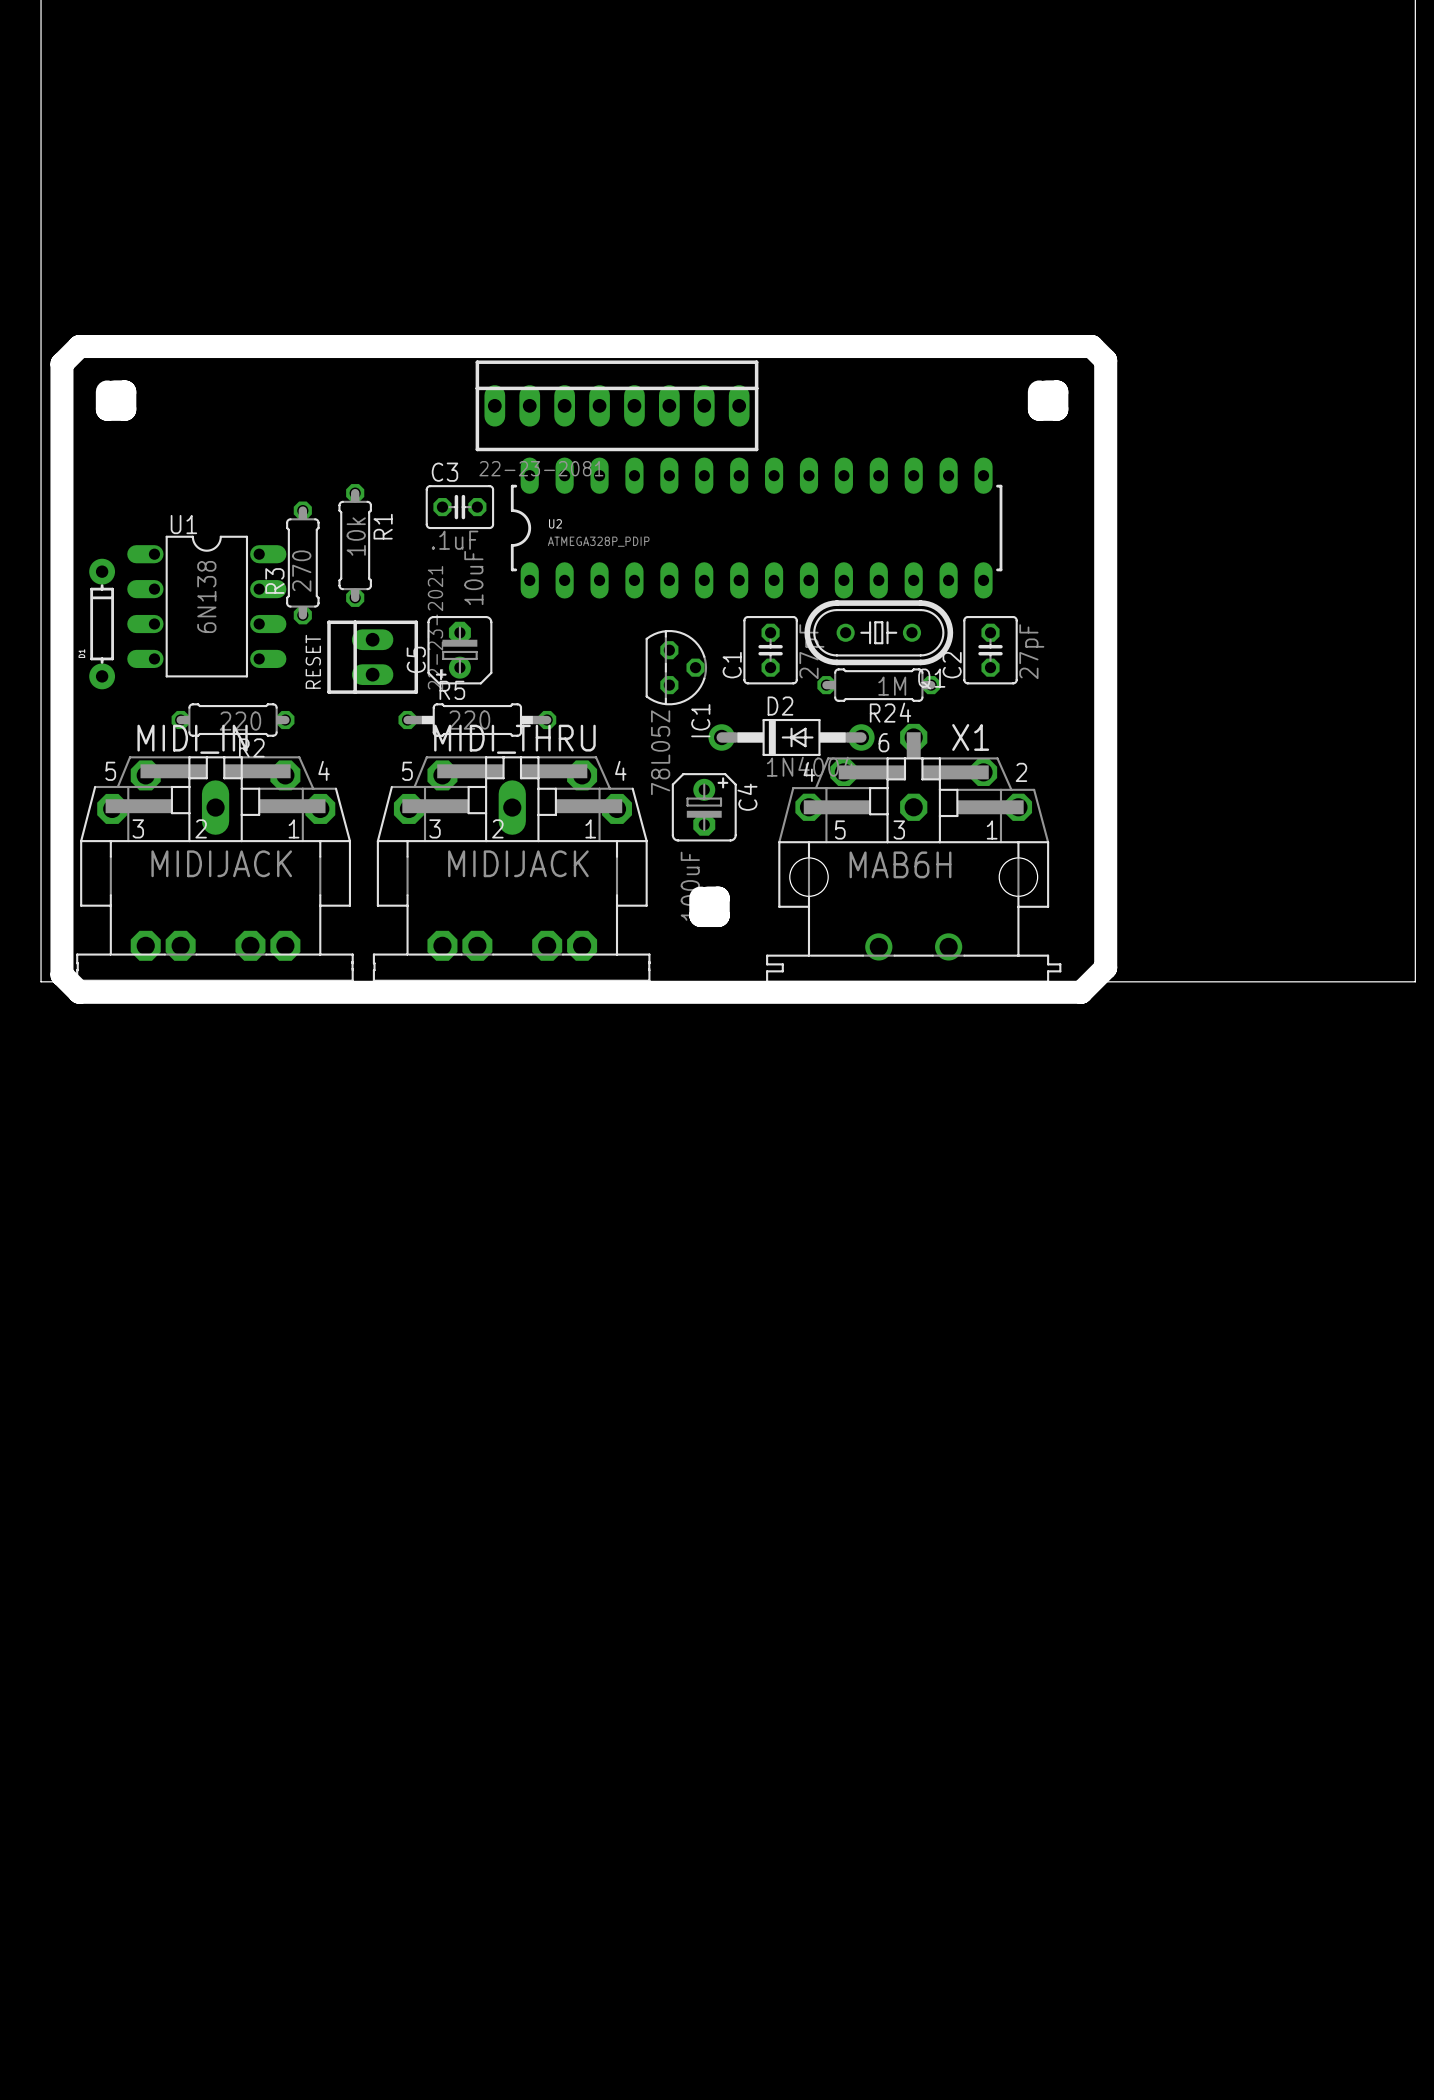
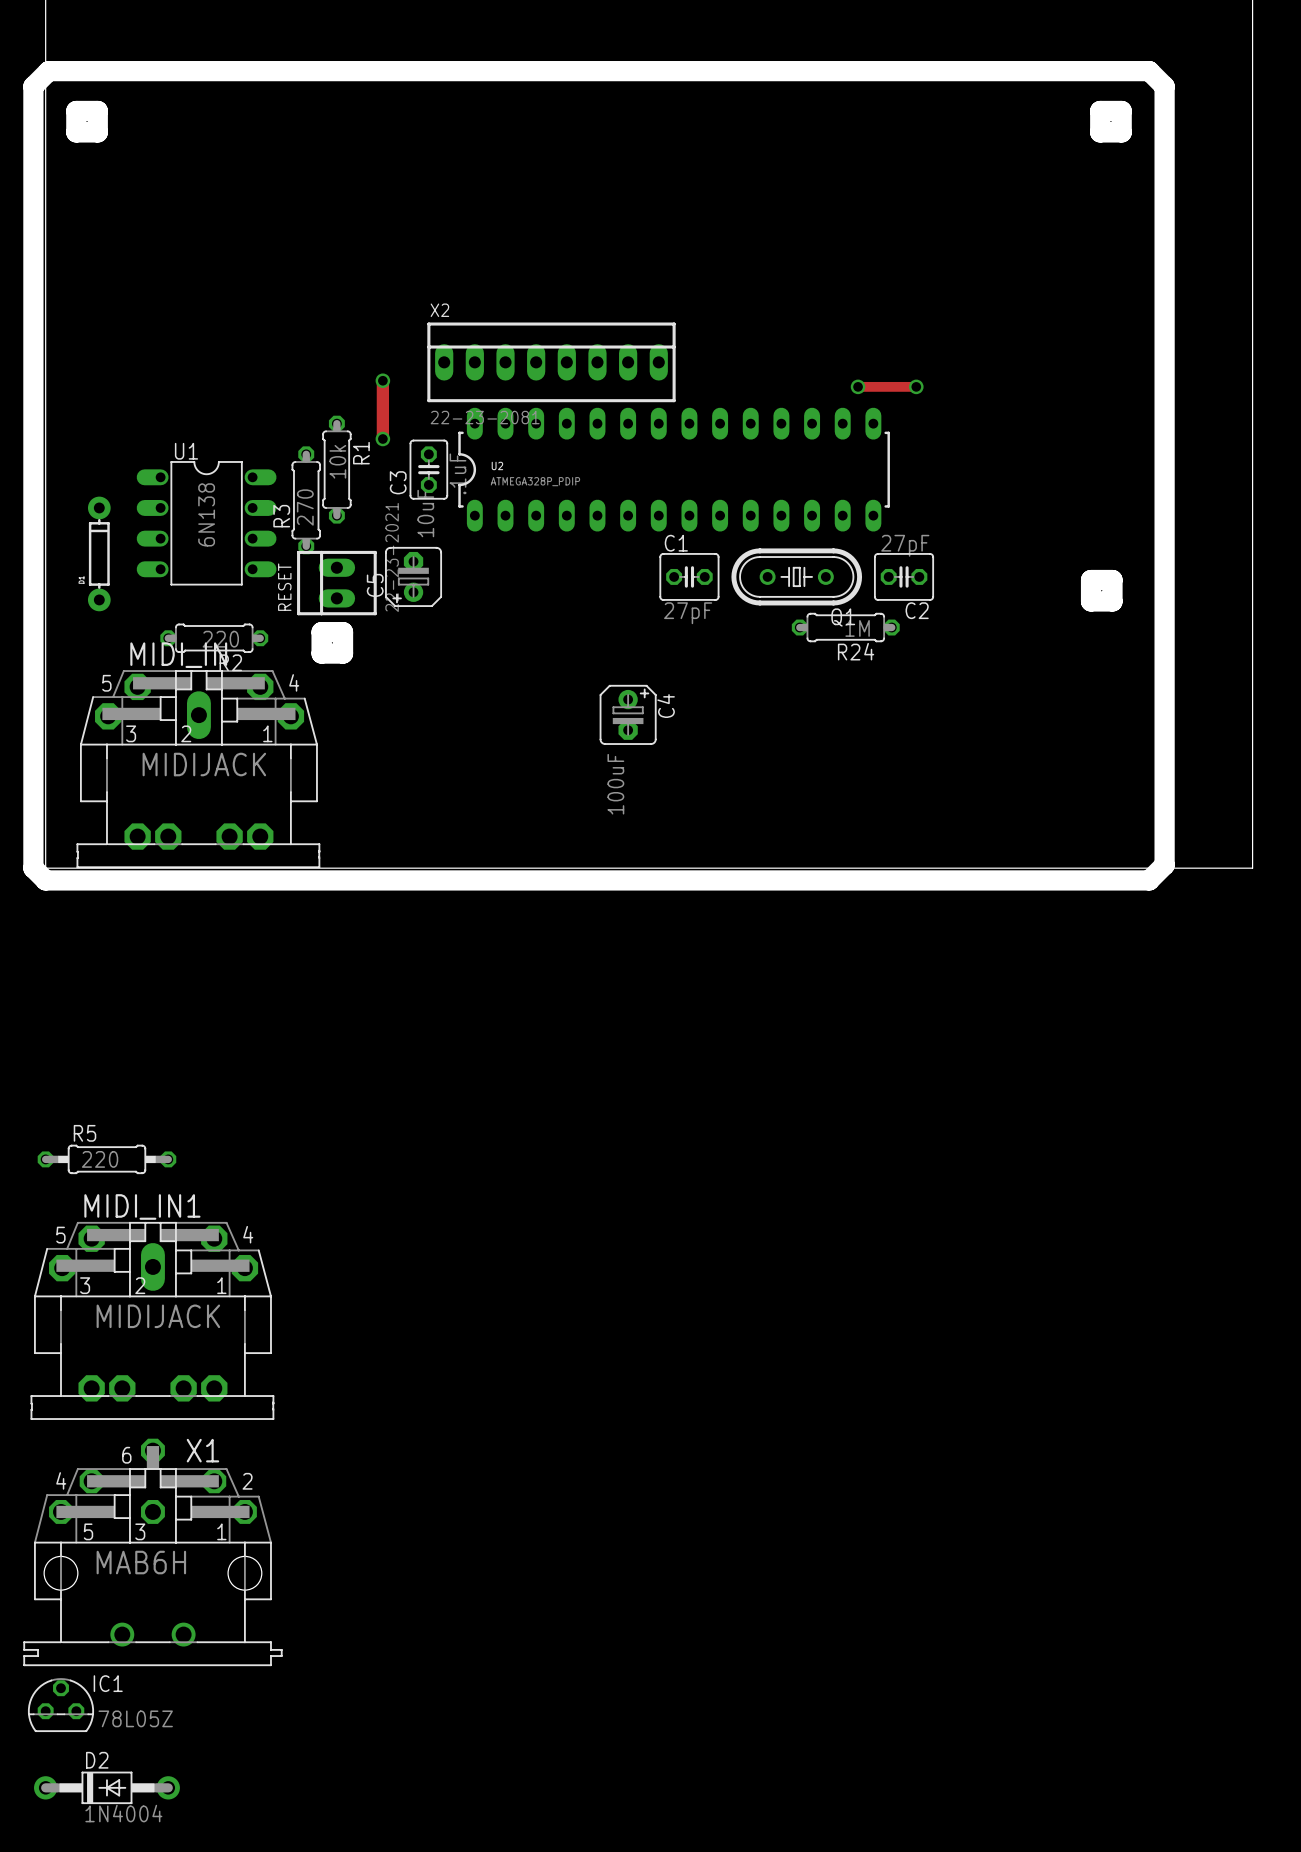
board edge: none -> (76, 110) (97, 110) (97, 132) (76, 132) (76, 110)
board edge: none -> (1100, 110) (1100, 132) (1121, 132) (1121, 110) (1100, 110)
board edge: (79, 346) (61, 363) (61, 974) (79, 992) (1081, 992) (1105, 967) (1105, 360) (1091, 346) (79, 346) -> (48, 71) (33, 86) (33, 868) (45, 880) (1149, 880) (1164, 865) (1164, 86) (1149, 71) (48, 71)
board edge: (107, 391) (107, 409) (124, 409) (124, 391) (114, 391) -> none
board edge: (1039, 391) (1039, 409) (1056, 409) (1056, 391) (1046, 391) -> none
track: none -> (382, 380) (382, 438)
via: none -> (382, 380)
track: none -> (858, 386) (916, 386)
via: none -> (858, 386)
via: none -> (916, 386)
C3 name position: C3 (444, 472) -> C3 (398, 482)
via: none -> (382, 438)
C3 rotation: 0° (459, 507) -> 90° clockwise (428, 469)
C3 value position: .1uF (455, 540) -> .1uF (457, 473)
R1 position: (355, 545) -> (336, 469)
R3 position: (302, 562) -> (306, 500)
U1 position: (206, 606) -> (206, 523)
Q1 position: (878, 632) -> (796, 576)
C1 rotation: 0° (770, 650) -> 90° clockwise (689, 576)
C2 rotation: 0° (990, 650) -> 90° clockwise (904, 576)
C2 value position: 27pF (1031, 651) -> 27pF (905, 545)
board edge: none -> (1091, 580) (1091, 601) (1112, 601) (1112, 580) (1091, 580)
C2 name position: C2 (952, 665) -> C2 (917, 610)
IC1 rotation: 0° (676, 667) -> 90° counterclockwise (60, 1705)
IC1 position: (676, 667) -> (60, 1705)
R24 position: (878, 685) -> (845, 627)
board edge: none -> (321, 632) (321, 653) (343, 653) (343, 632) (321, 632)
R5 position: (477, 720) -> (106, 1159)
D2 position: (791, 737) -> (106, 1787)
X1 position: (913, 853) -> (152, 1552)
MIDI_THRU: MIDIJACK (511, 869) -> none
board edge: (700, 898) (700, 915) (718, 915) (718, 898) (707, 898) -> none
MIDI_IN1: none -> MIDIJACK (152, 1320)

